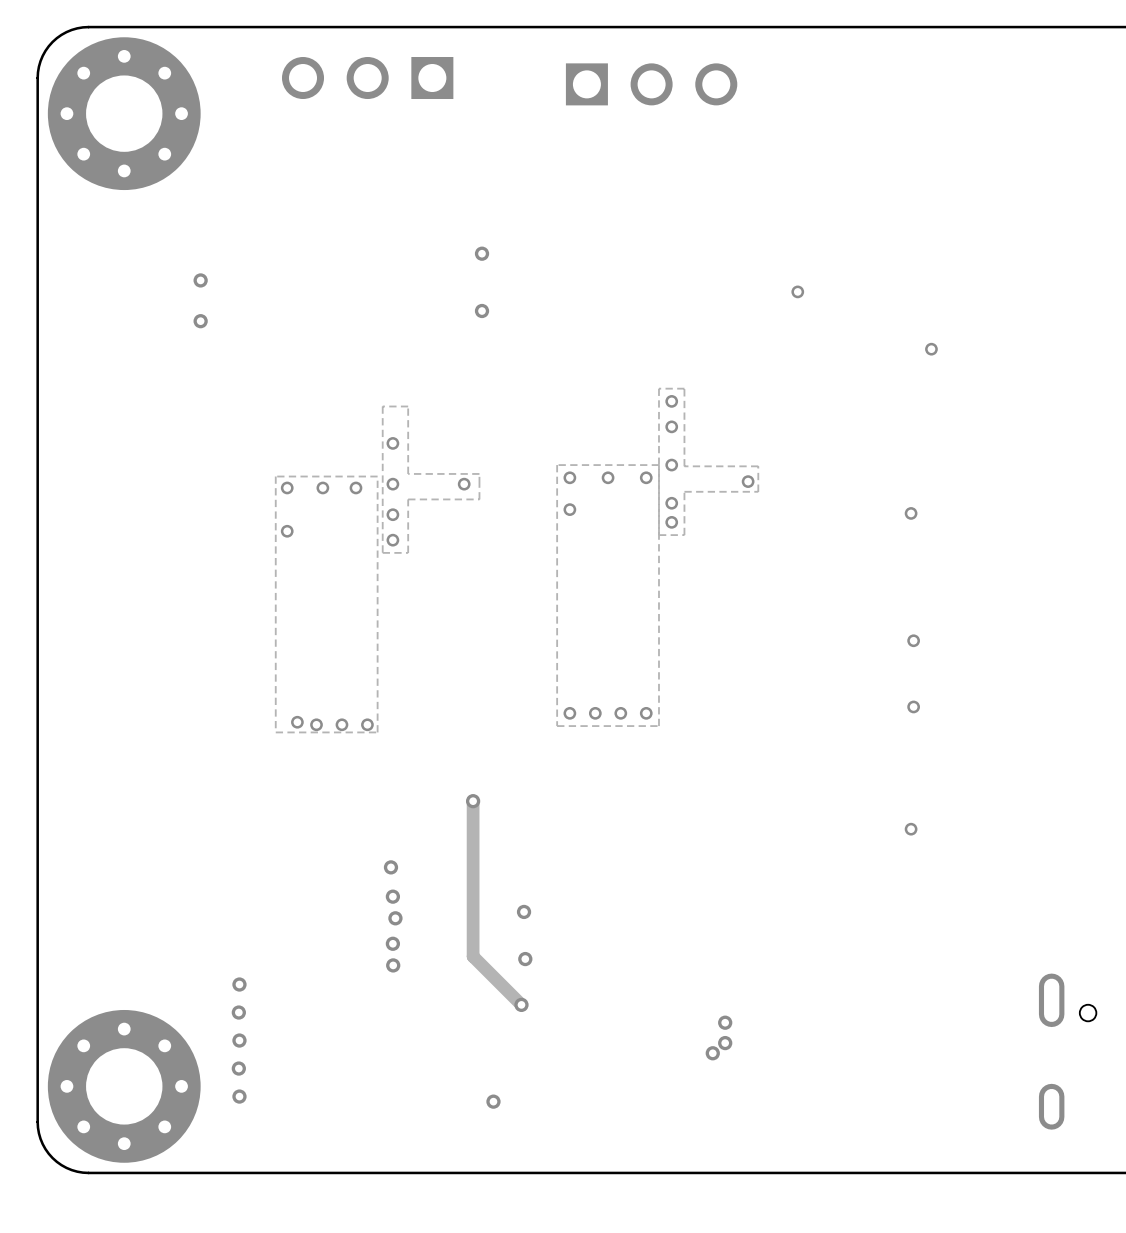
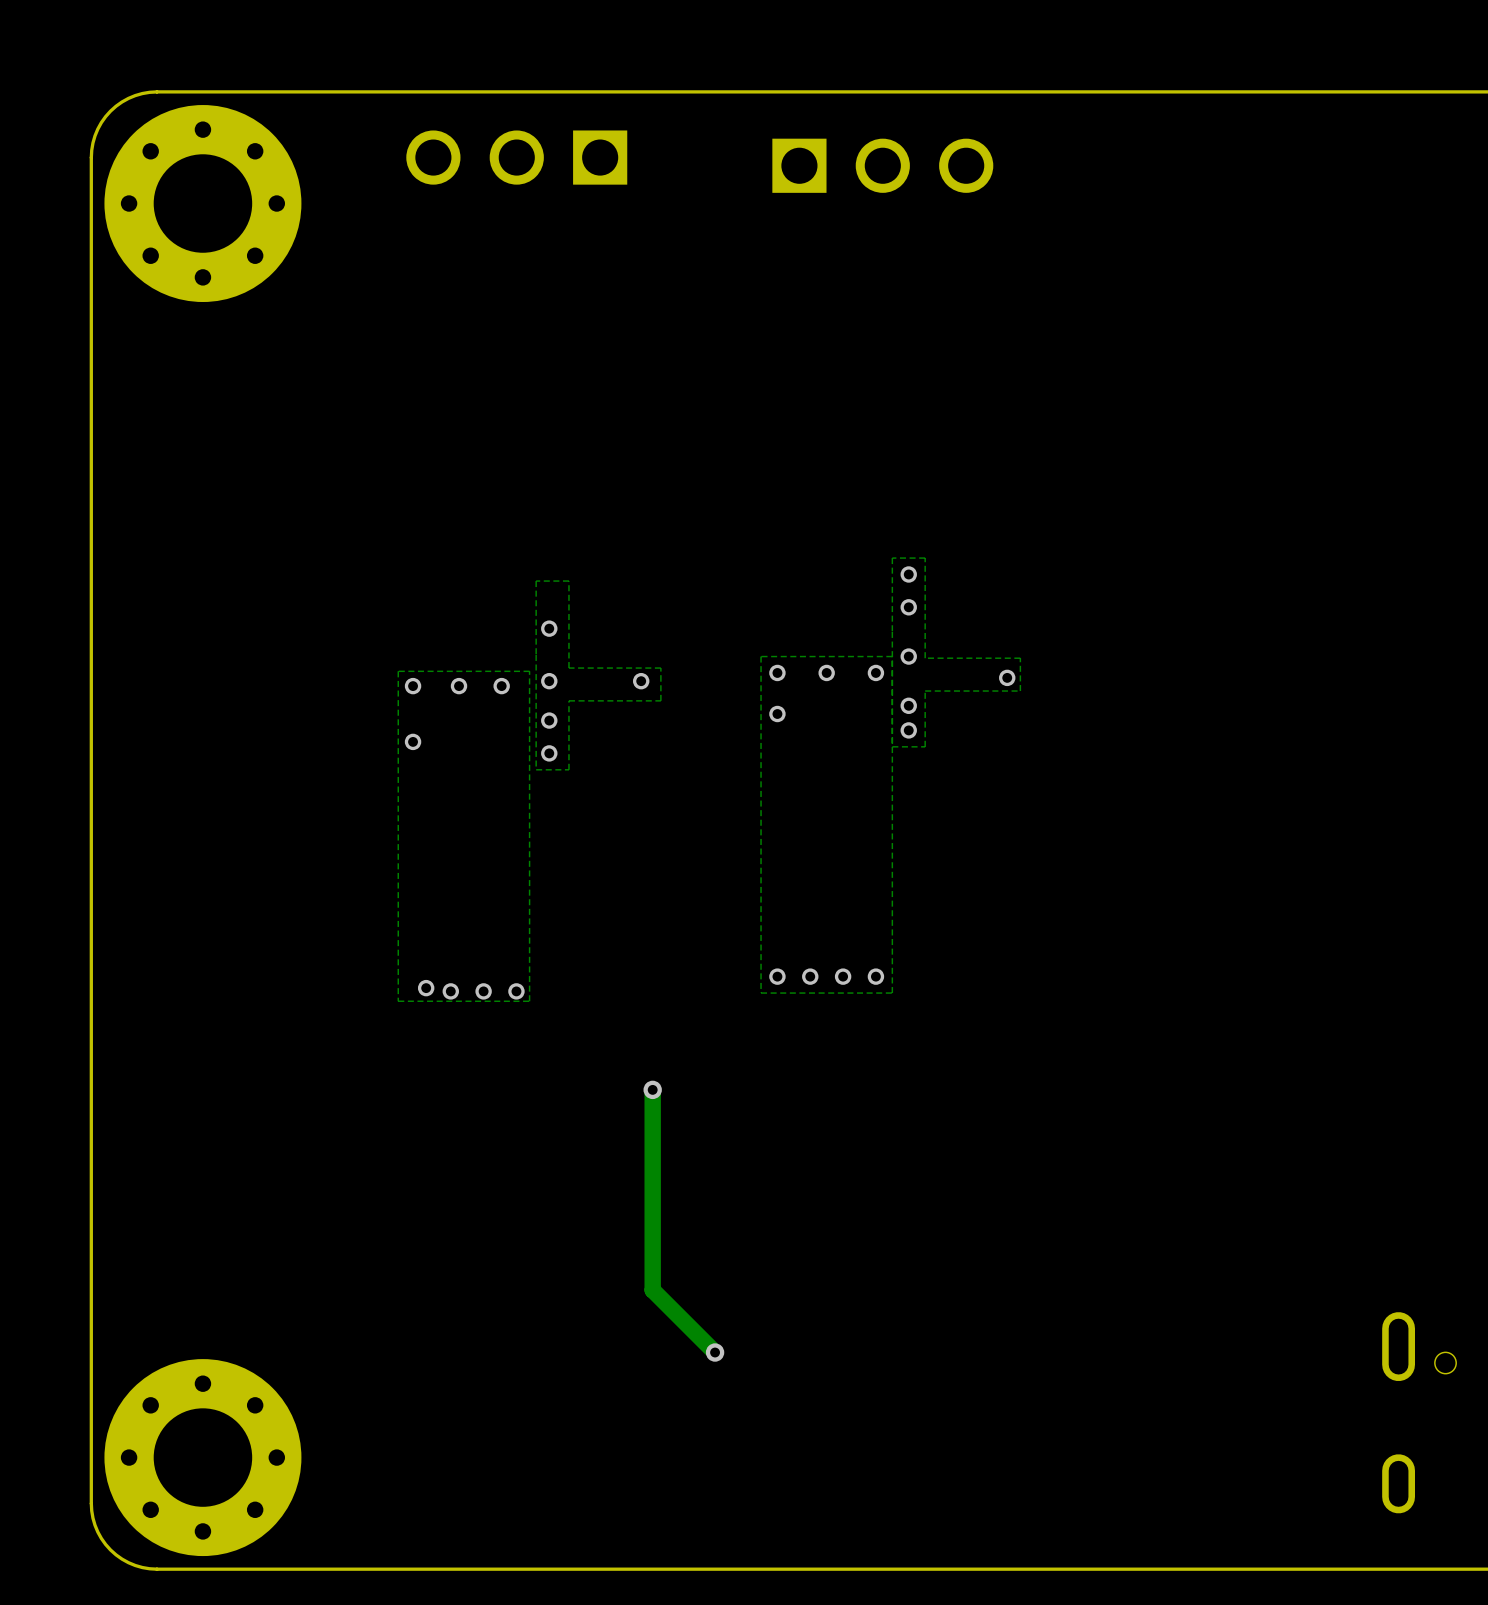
via: (482, 253) -> none
via: (200, 280) -> none
via: (797, 291) -> none
via: (482, 311) -> none
via: (200, 321) -> none
via: (931, 349) -> none
via: (911, 513) -> none
via: (913, 640) -> none
via: (913, 706) -> none
via: (911, 829) -> none
via: (390, 867) -> none
via: (392, 896) -> none
via: (524, 911) -> none
via: (395, 918) -> none
via: (392, 943) -> none
via: (525, 959) -> none
via: (393, 965) -> none
via: (239, 984) -> none
via: (238, 1012) -> none
via: (725, 1022) -> none
via: (239, 1040) -> none
via: (725, 1043) -> none
via: (712, 1053) -> none
via: (238, 1068) -> none
via: (239, 1096) -> none
via: (493, 1101) -> none

